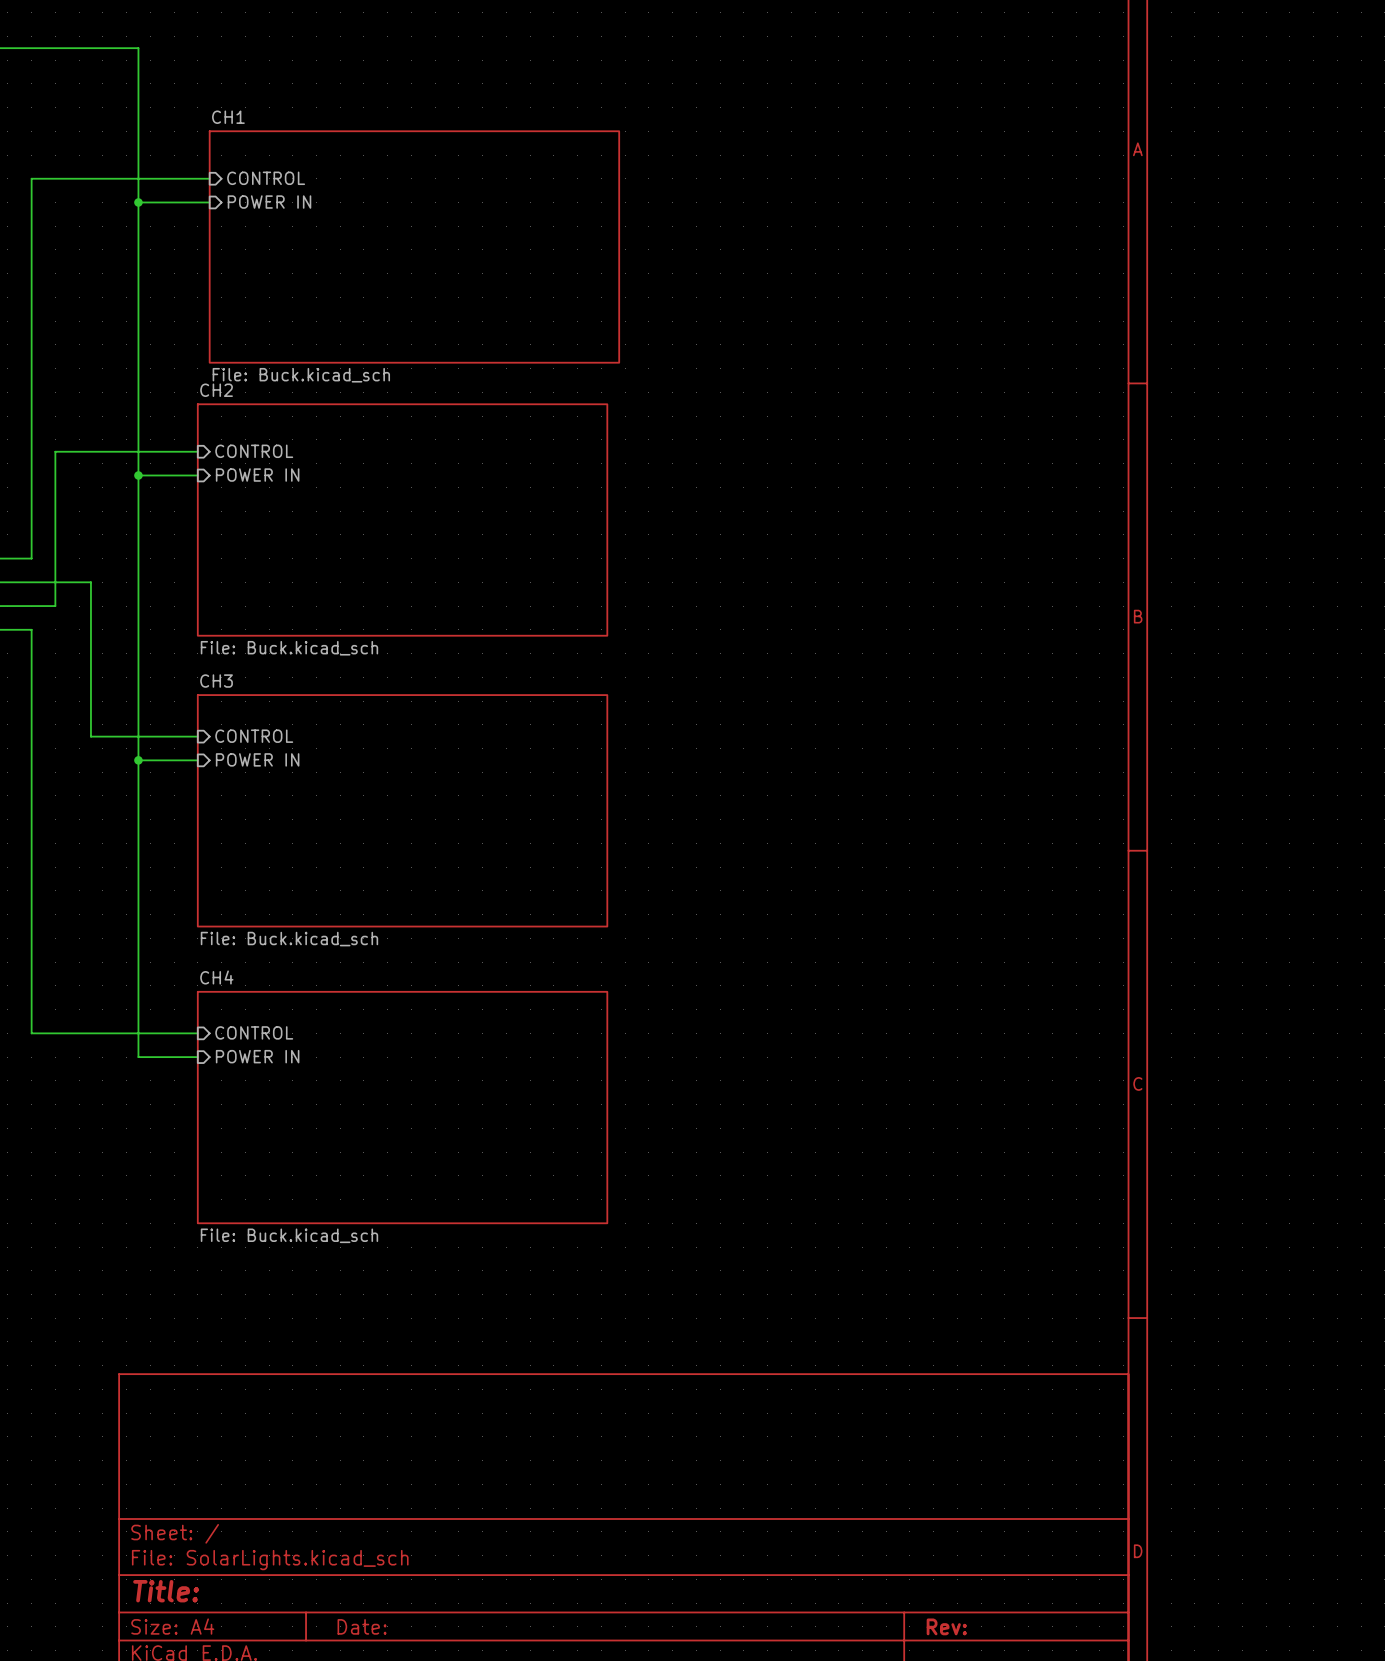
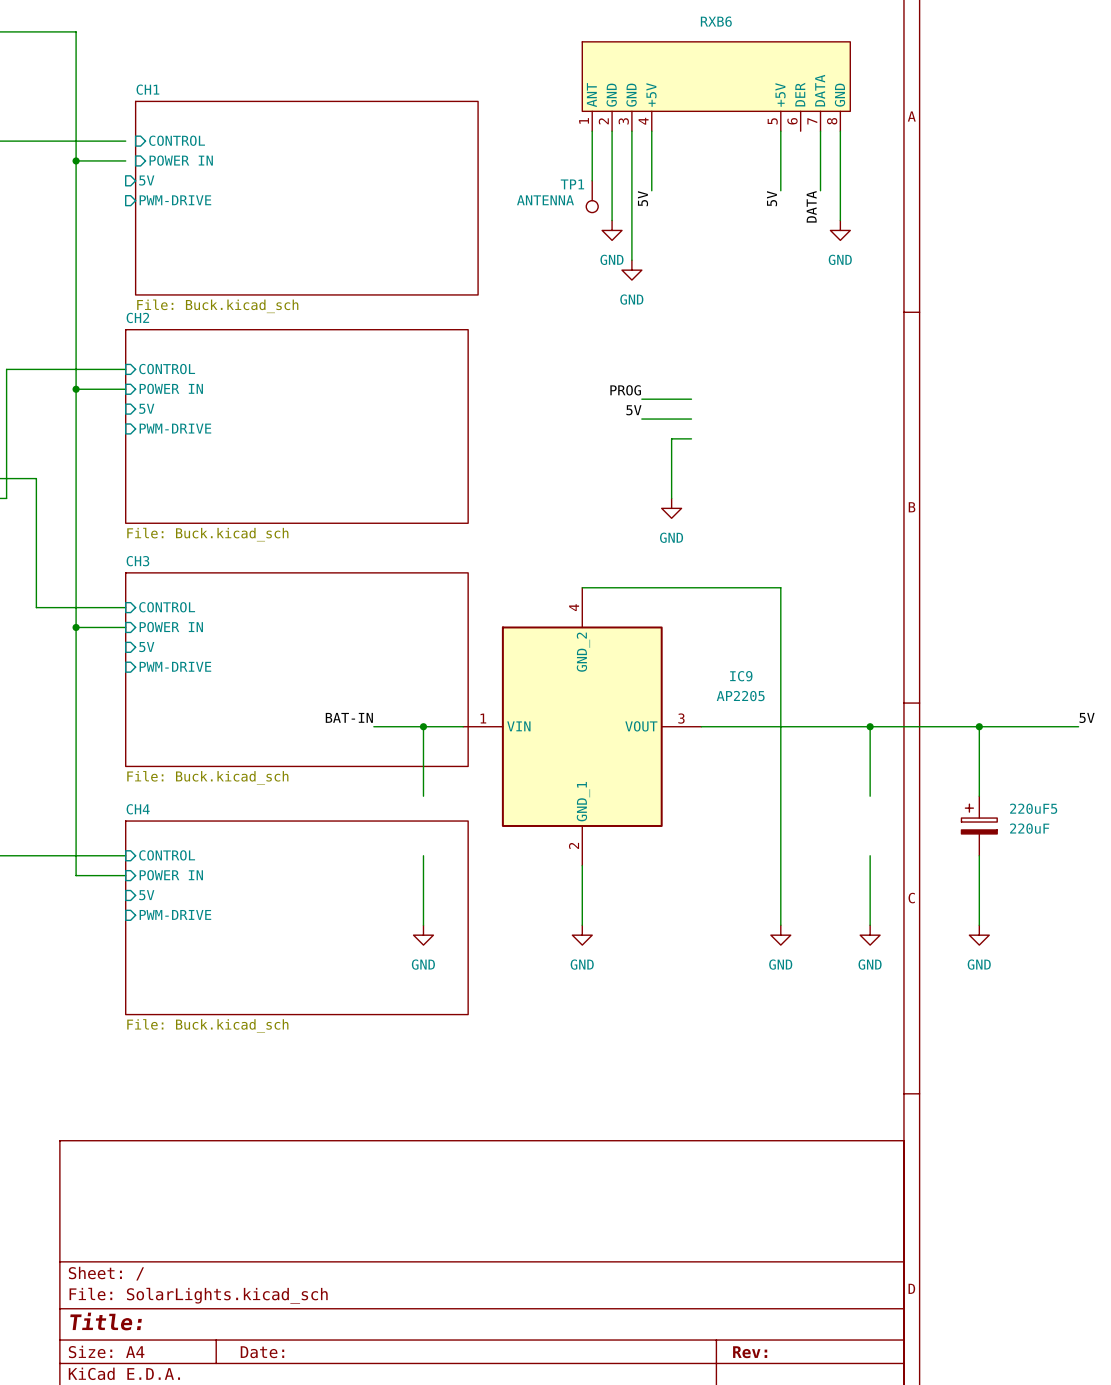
RXB6: none -> (716, 86)
wire: none -> (592, 131) (592, 180)
wire: none -> (612, 131) (612, 220)
wire: none -> (631, 131) (631, 260)
wire: none -> (651, 131) (651, 190)
wire: none -> (780, 131) (780, 190)
wire: none -> (820, 131) (820, 190)
wire: none -> (840, 131) (840, 220)
wire: (197, 178) (209, 178) -> none
wire: (197, 202) (209, 202) -> none
sheet pin: none -> 5V (146, 180)
TP1: none -> ANTENNA (592, 196)
sheet pin: none -> PWM-DRIVE (175, 200)
label: none -> 5V (643, 198)
label: none -> 5V (772, 198)
label: none -> DATA (811, 206)
power symbol: none -> GND (612, 230)
power symbol: none -> GND (840, 230)
power symbol: none -> GND (631, 270)
label: none -> PROG (625, 390)
wire: none -> (641, 399) (691, 399)
sheet pin: none -> 5V (146, 408)
label: none -> 5V (633, 410)
wire: none -> (641, 419) (691, 419)
sheet pin: none -> PWM-DRIVE (175, 428)
wire: none -> (691, 438) (671, 438) (671, 498)
power symbol: none -> GND (671, 508)
wire: none -> (582, 587) (780, 587) (780, 925)
sheet pin: none -> 5V (146, 647)
sheet pin: none -> PWM-DRIVE (175, 666)
label: none -> BAT-IN (349, 717)
label: none -> 5V (1087, 717)
wire: none -> (373, 726) (463, 726)
wire: none -> (423, 726) (423, 796)
junction: none -> (423, 726)
IC9: none -> AP2205 (582, 726)
wire: none -> (701, 726) (1078, 726)
wire: none -> (870, 726) (870, 796)
junction: none -> (870, 726)
wire: none -> (979, 726) (979, 796)
junction: none -> (979, 726)
220uF5: none -> 220uF (979, 825)
wire: none -> (423, 855) (423, 925)
wire: none -> (870, 855) (870, 925)
wire: none -> (979, 855) (979, 925)
wire: none -> (582, 865) (582, 925)
sheet pin: none -> 5V (146, 895)
sheet pin: none -> PWM-DRIVE (175, 914)
power symbol: none -> GND (423, 935)
power symbol: none -> GND (582, 935)
power symbol: none -> GND (780, 935)
power symbol: none -> GND (870, 935)
power symbol: none -> GND (979, 935)

